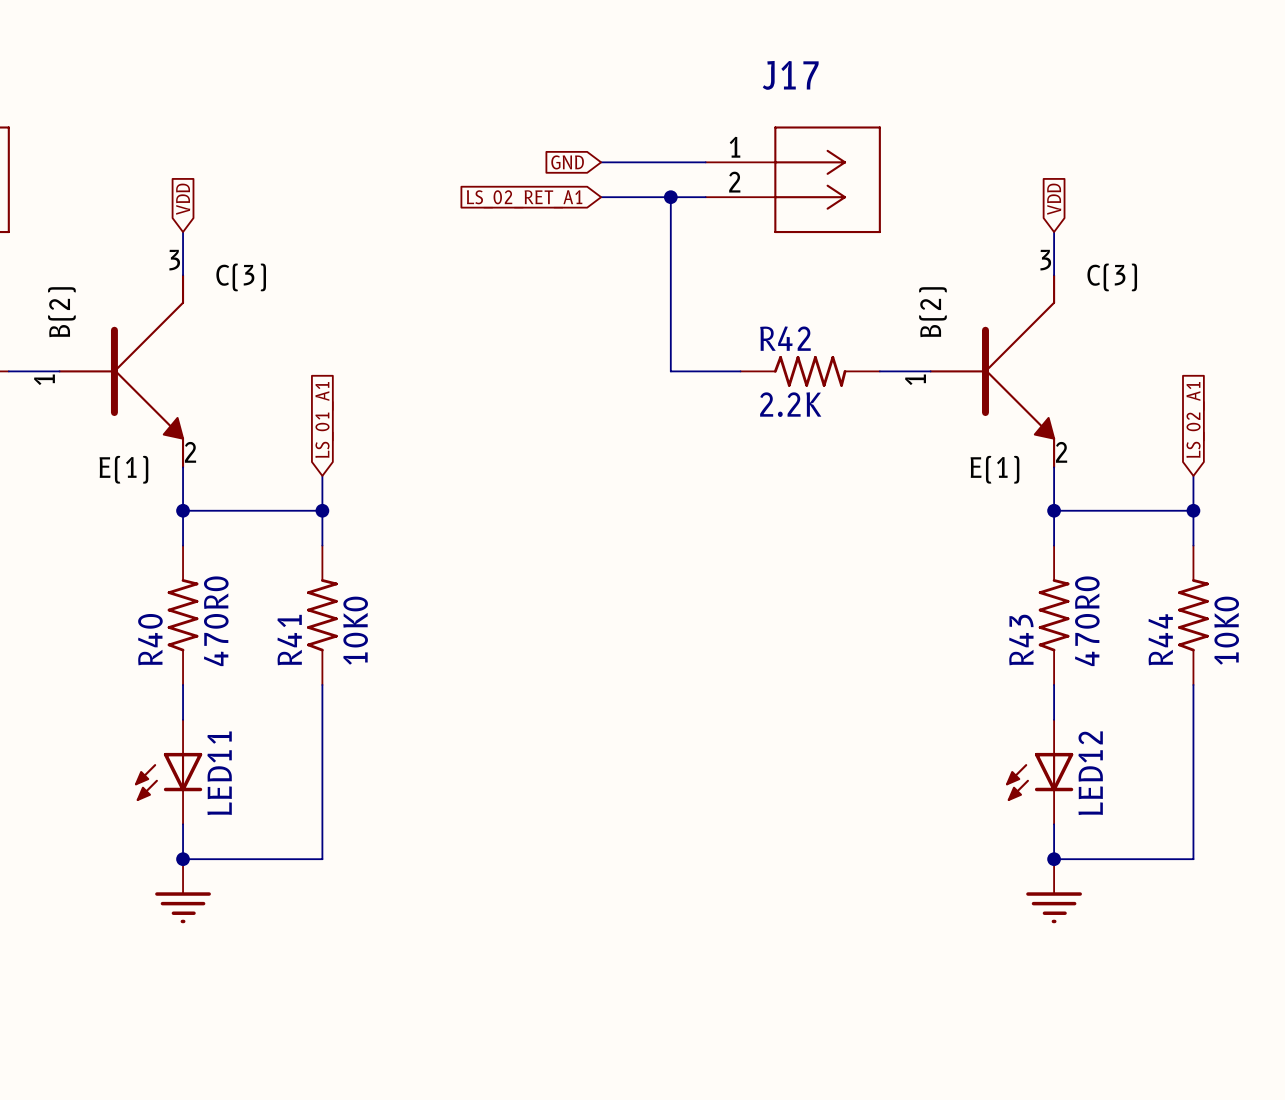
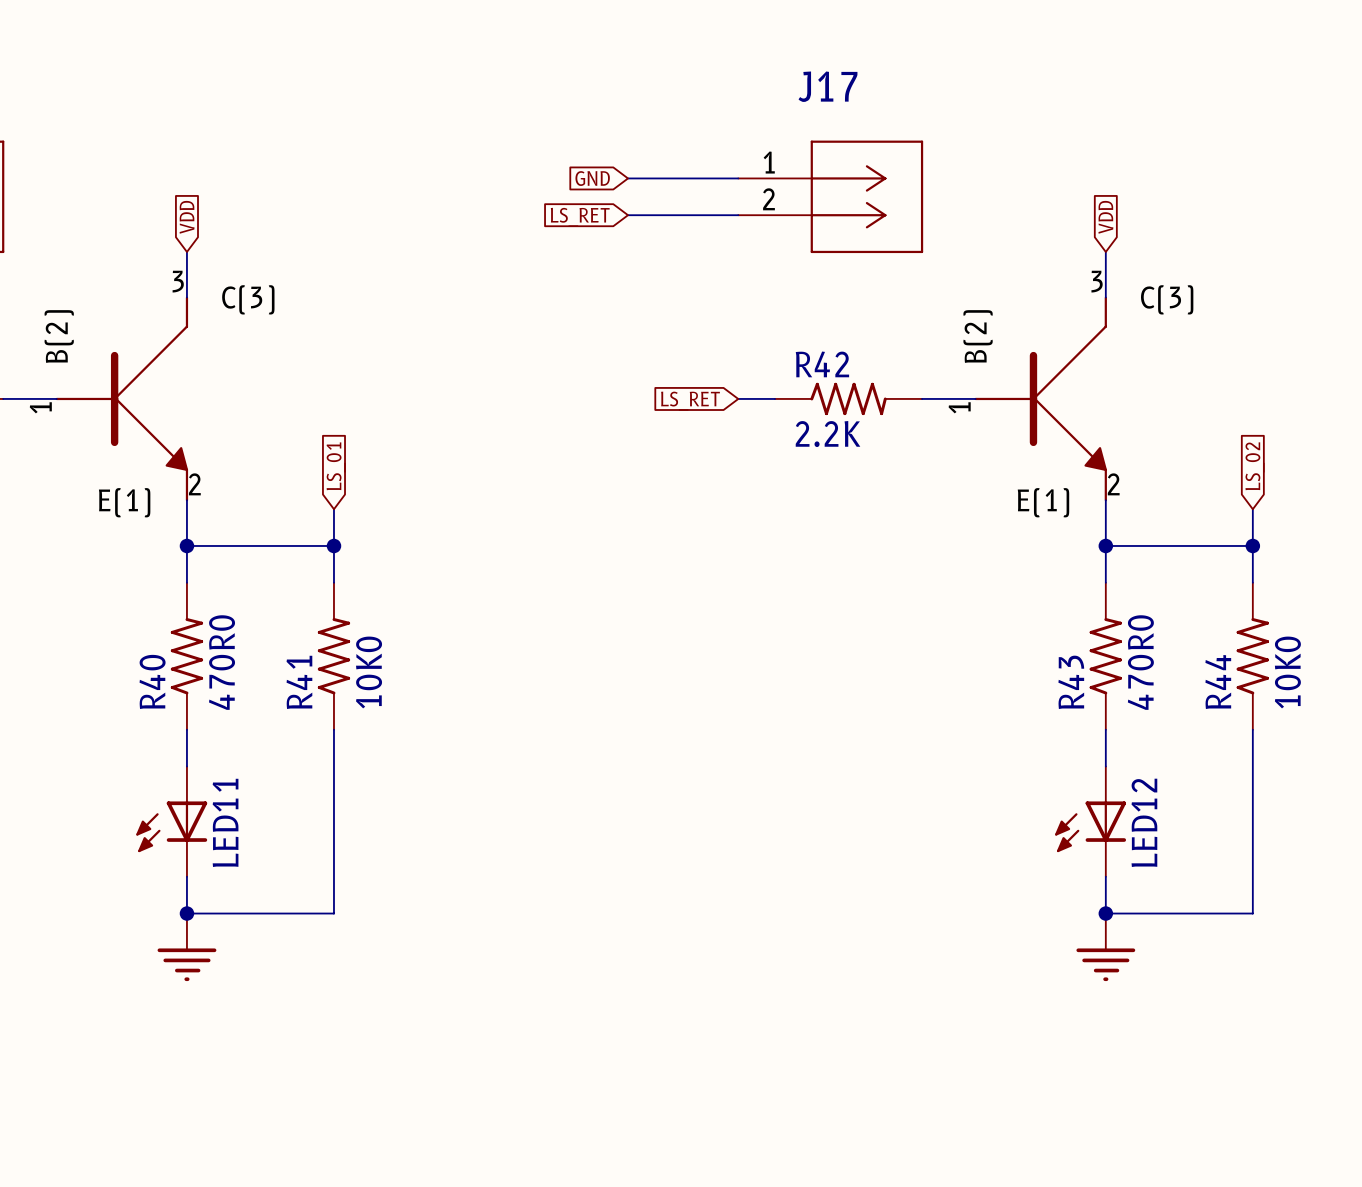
wire: (670, 197) (670, 371) (705, 371) -> none
junction: (670, 197) -> none
global label: LS_02_RET_A1 (524, 199) -> LS_RET (580, 217)
global label: none -> LS_RET (690, 401)
global label: LS_01_A1 (324, 419) -> LS_01 (336, 466)
global label: LS_02_A1 (1195, 419) -> LS_02 (1255, 466)

